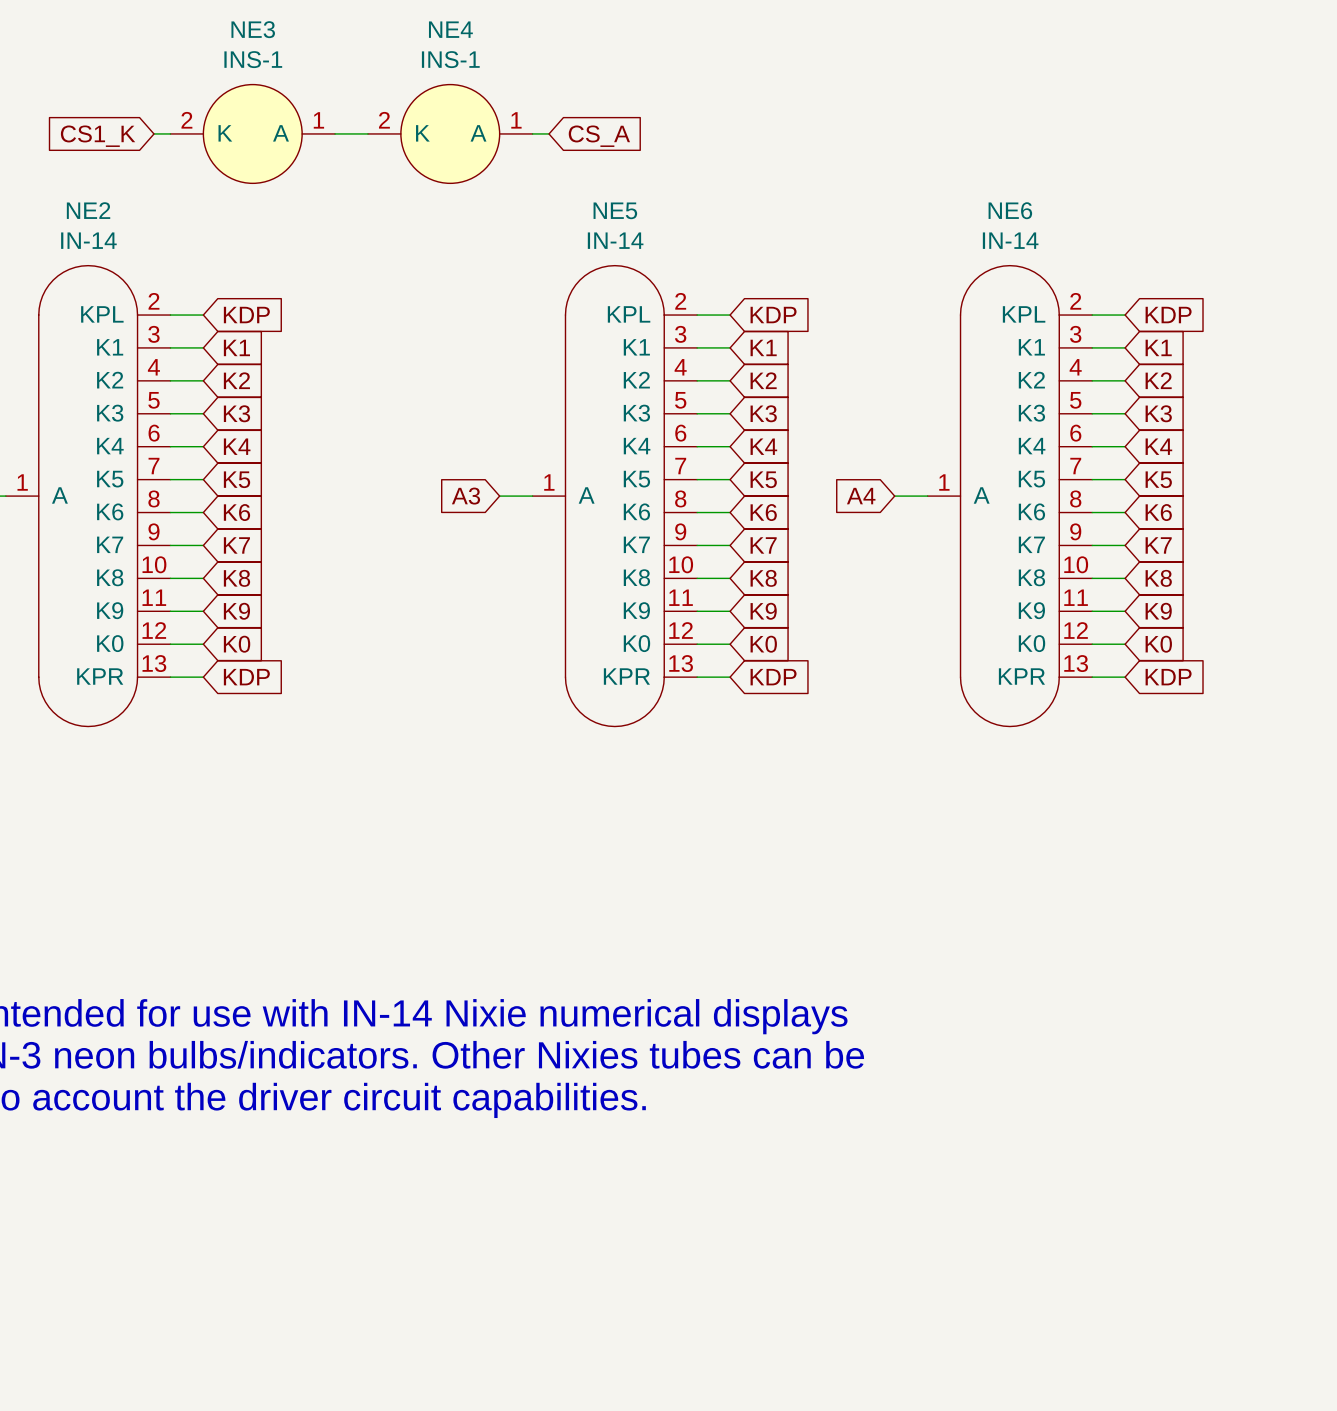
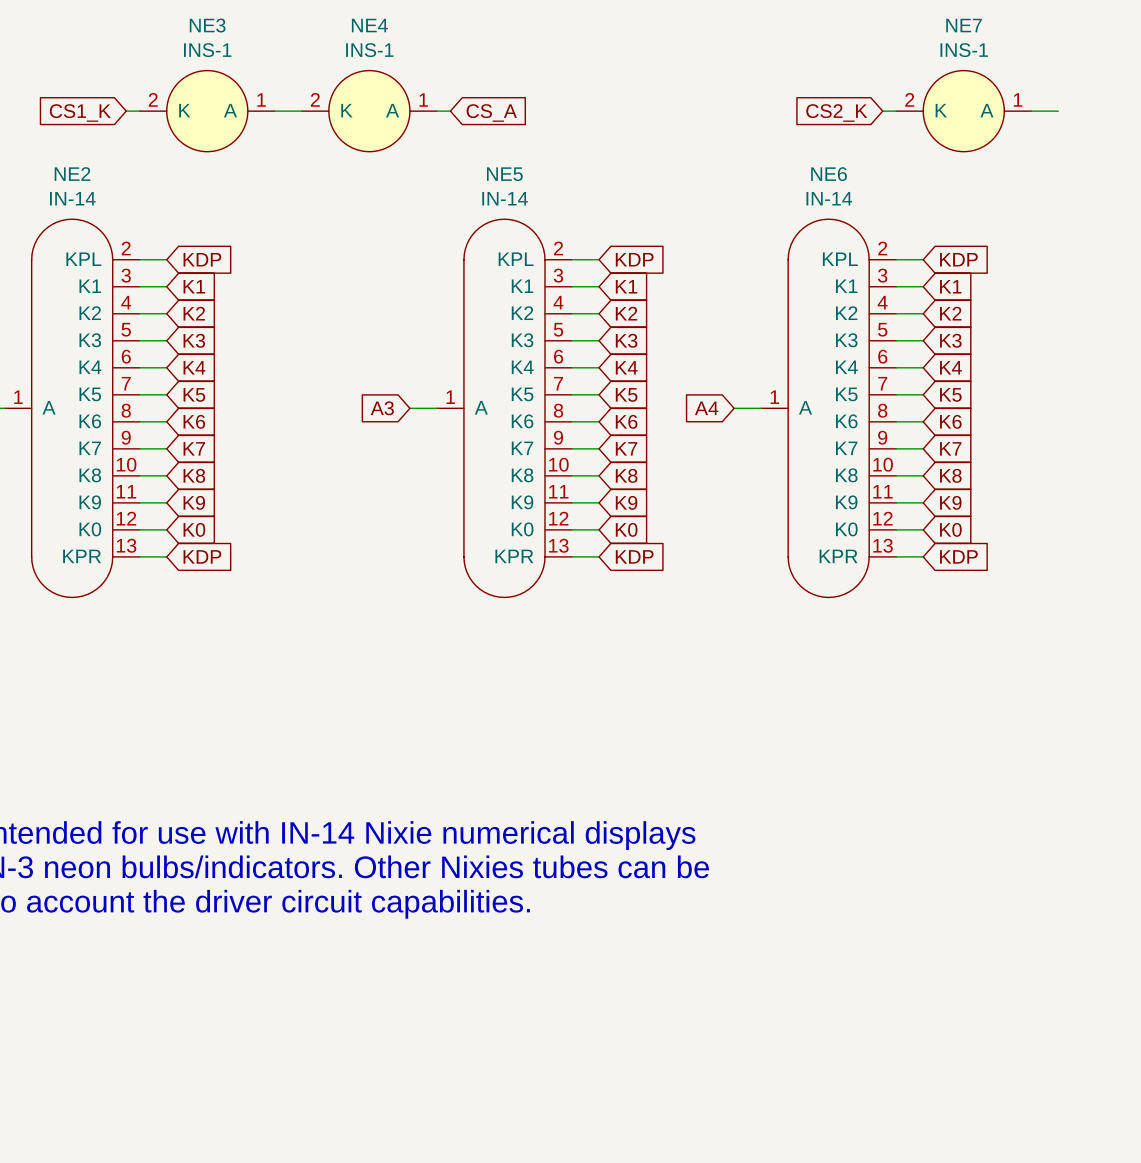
wire: none -> (882, 111) (896, 111)
NE7: none -> INS-1 (963, 111)
wire: none -> (1031, 111) (1058, 111)
global label: none -> CS2_K (836, 112)

